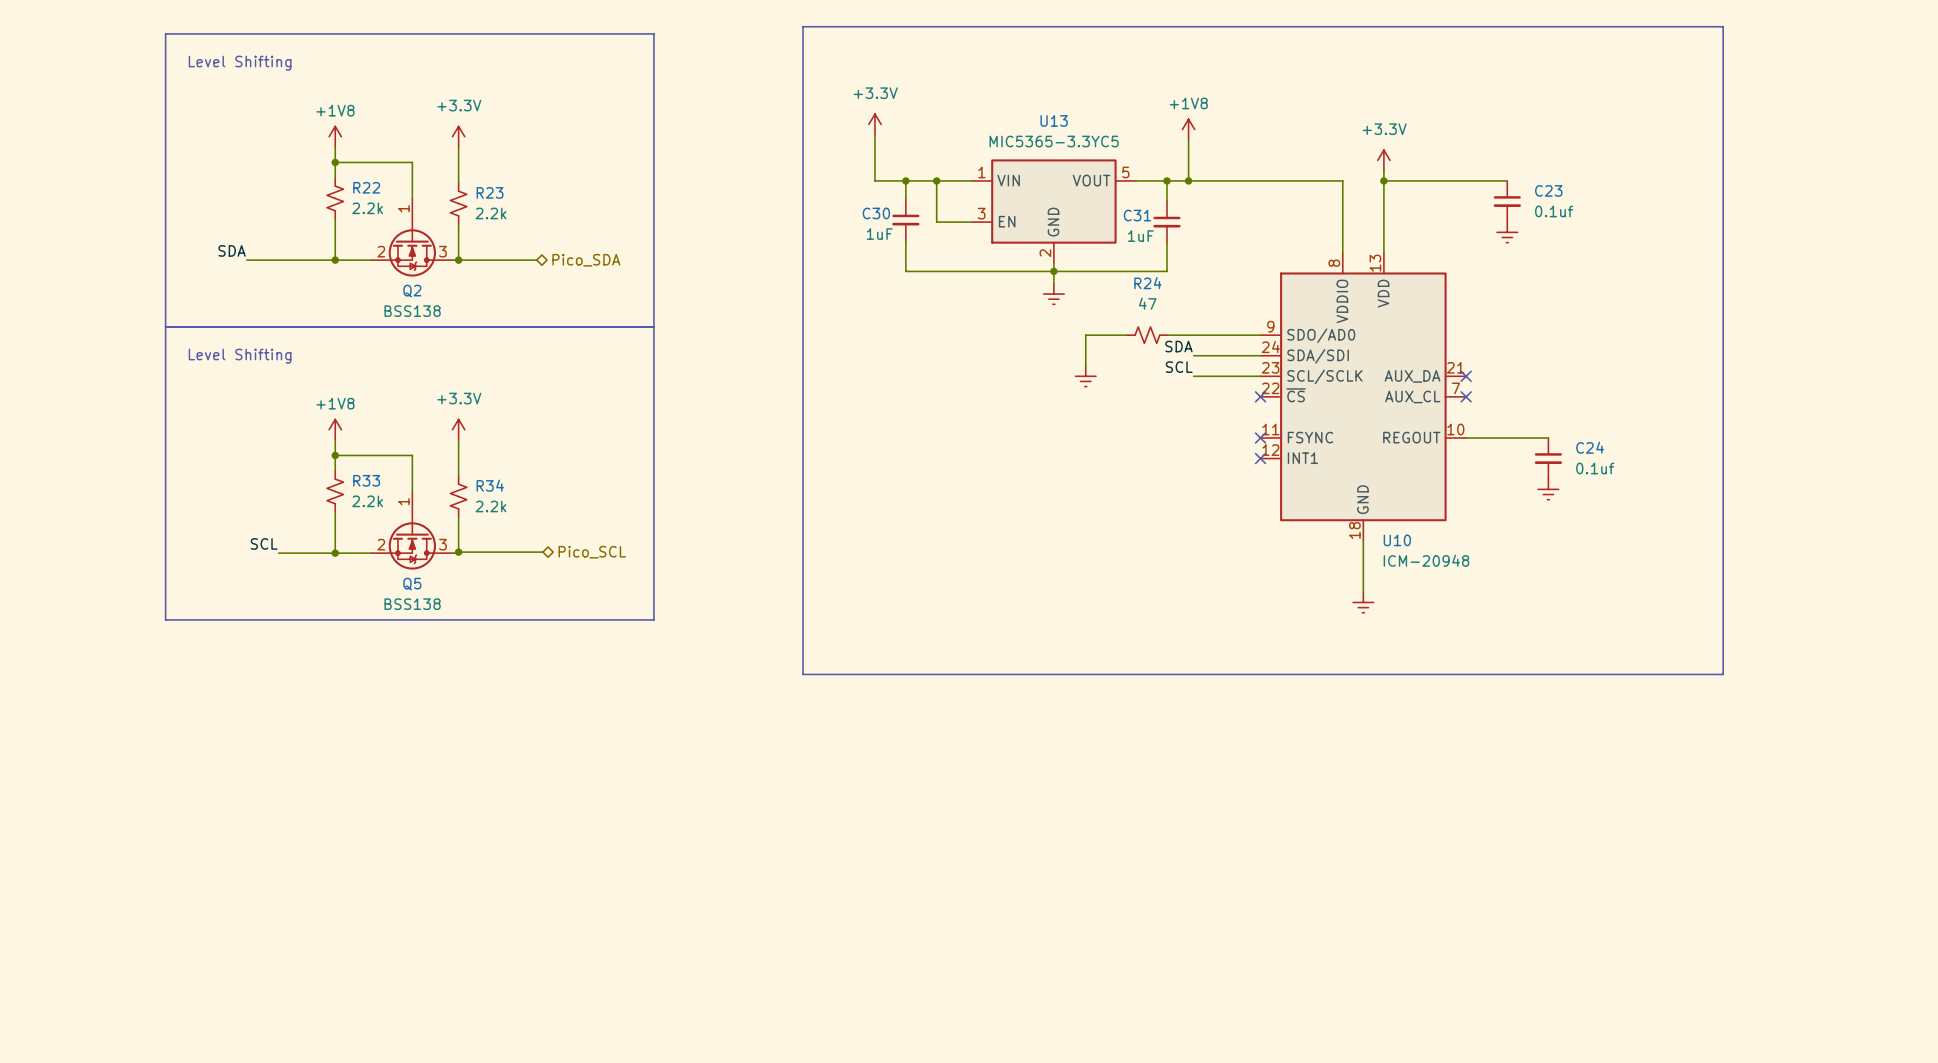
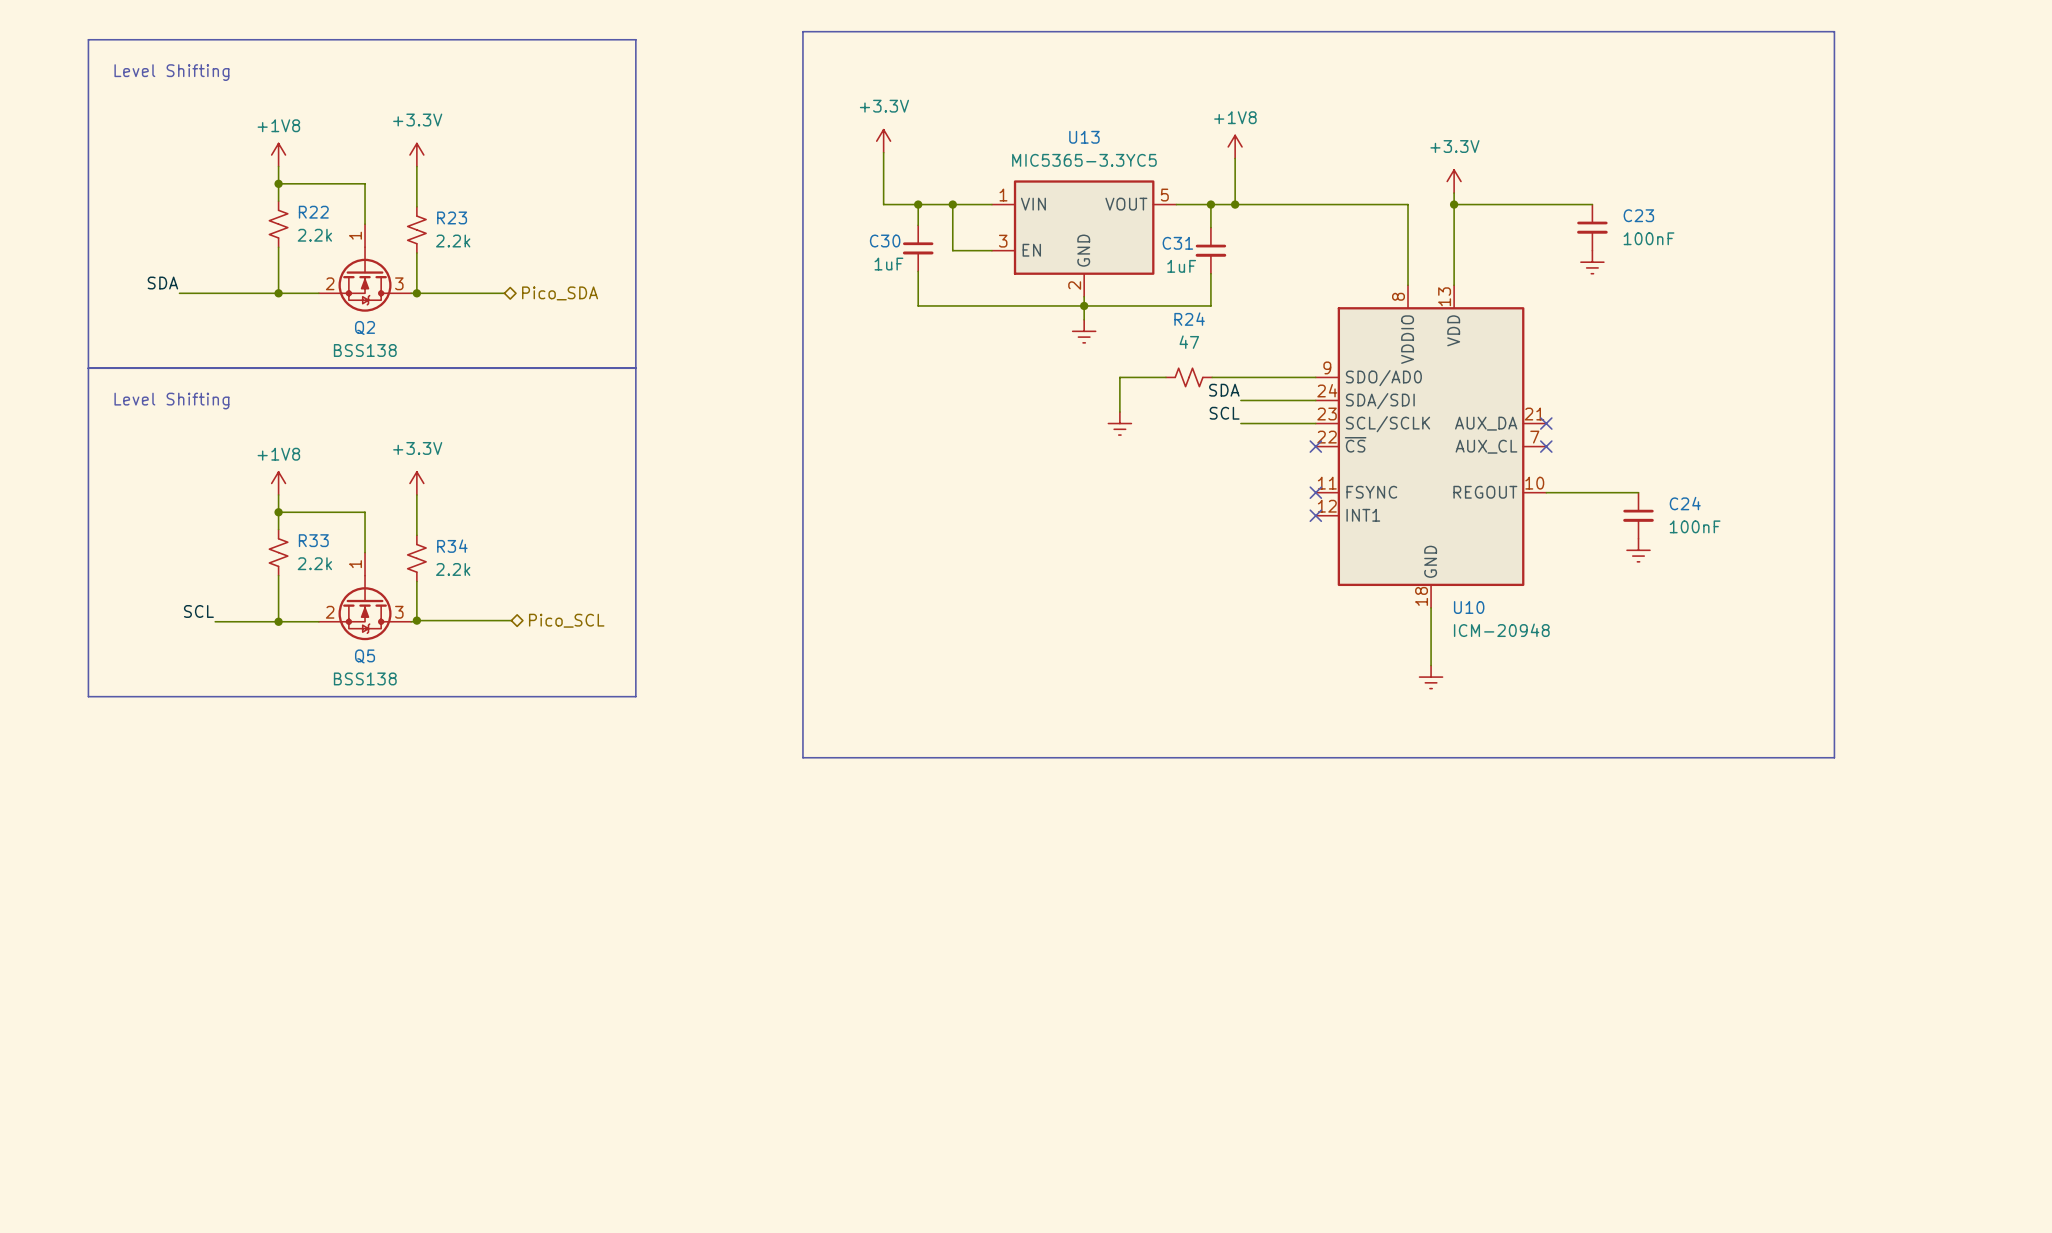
C23 value: 0.1uf (1554, 211) -> 100nF (1649, 238)
C24 value: 0.1uf (1595, 468) -> 100nF (1695, 526)

